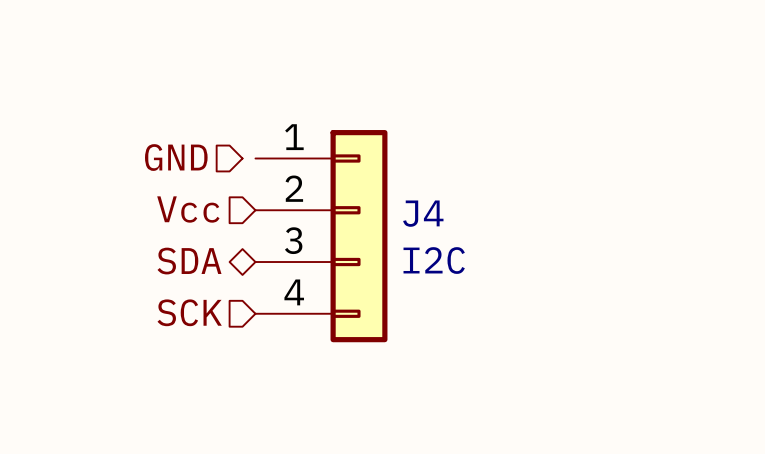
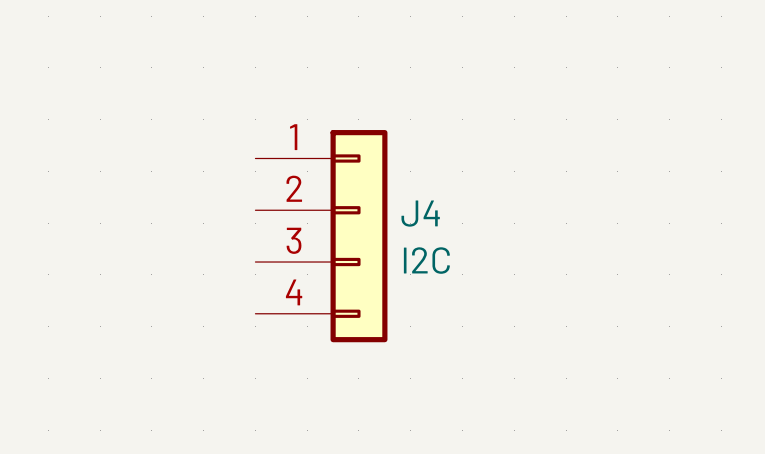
hierarchical label: GND (176, 157) -> none
hierarchical label: Vcc (188, 209) -> none
hierarchical label: SDA (189, 261) -> none
hierarchical label: SCK (189, 312) -> none

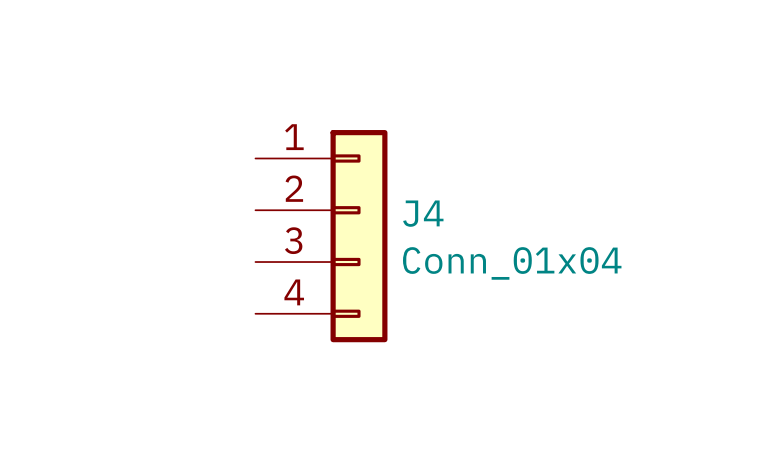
J4 value: I2C (426, 260) -> Conn_01x04 (512, 263)

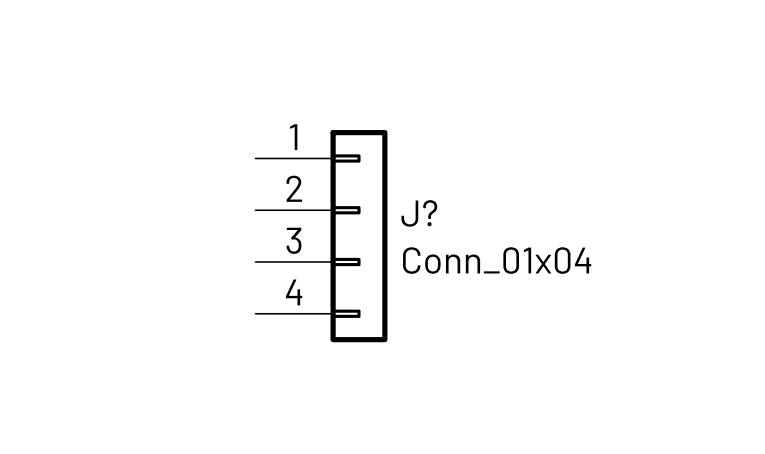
J4 name: J4 (423, 213) -> J? (419, 213)

